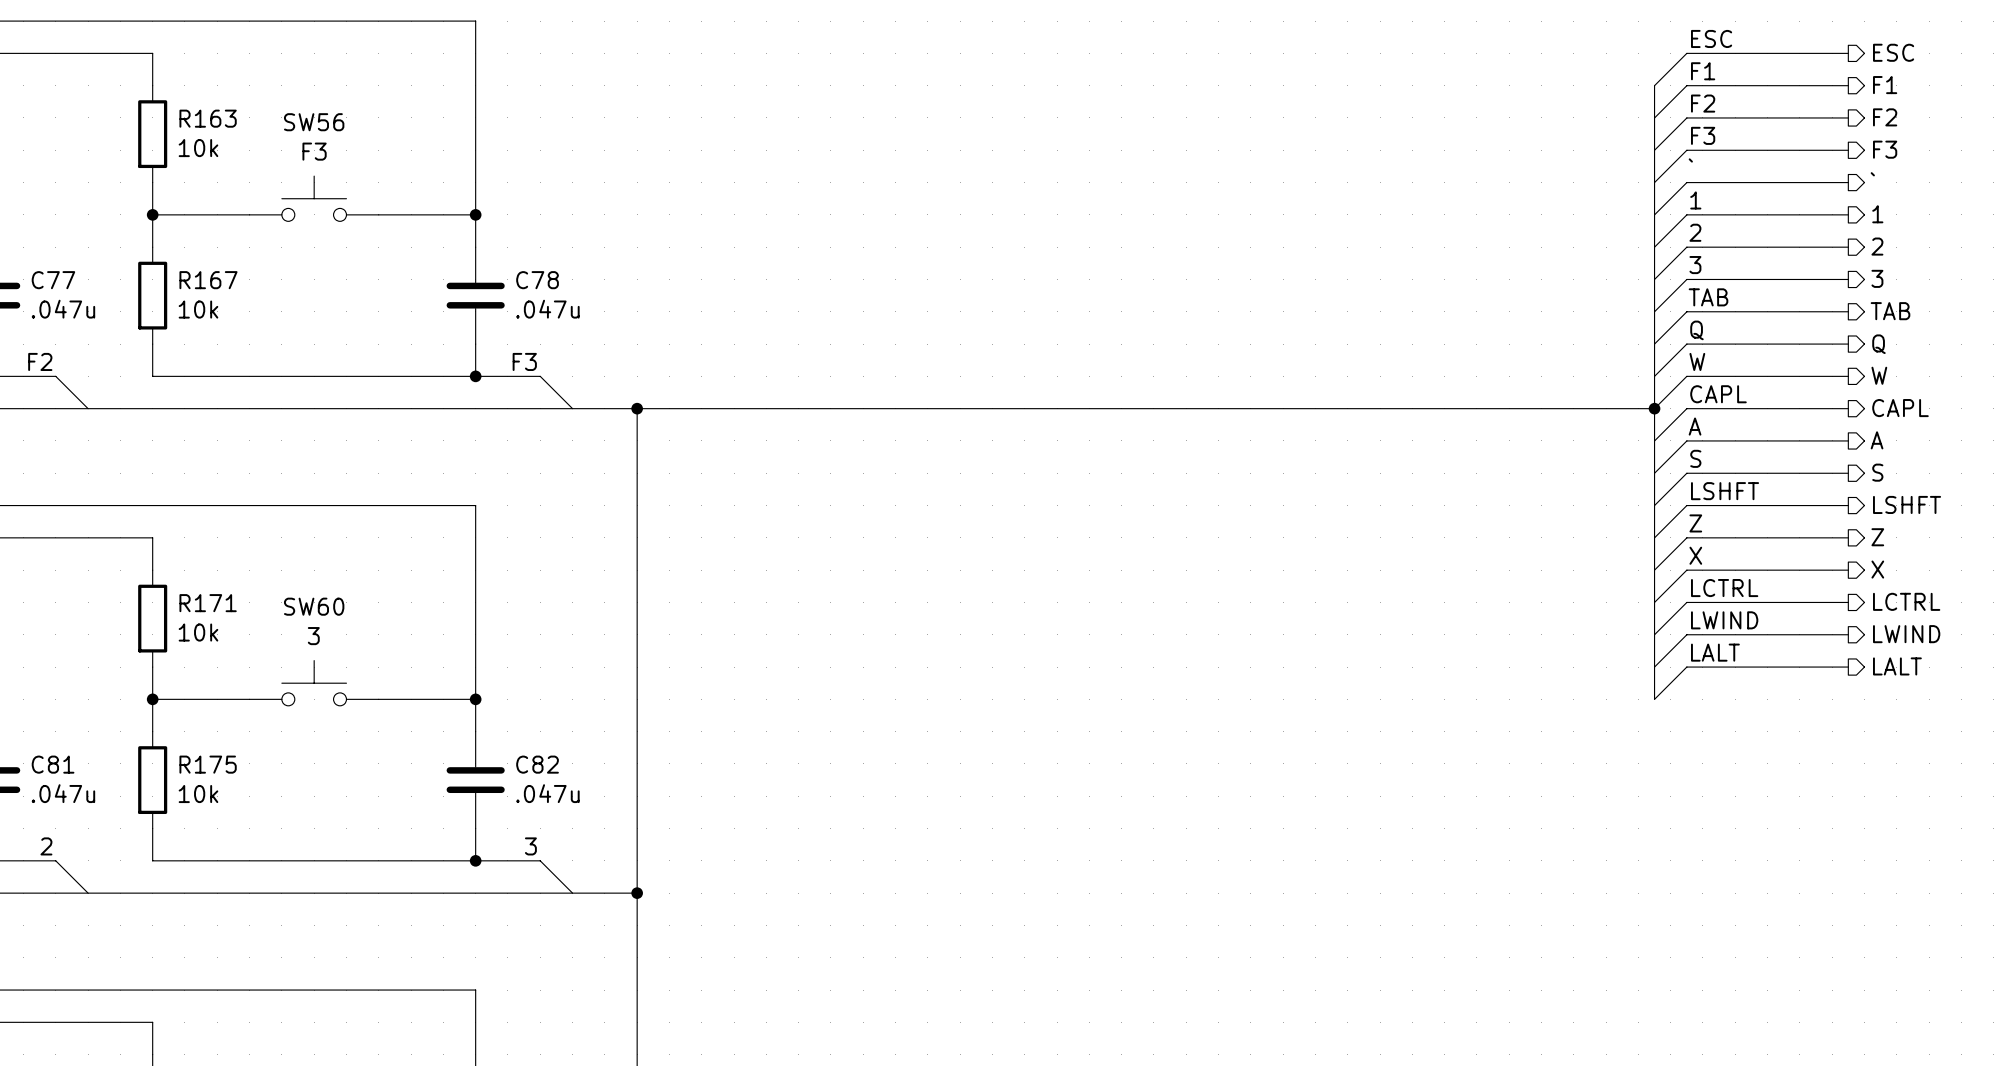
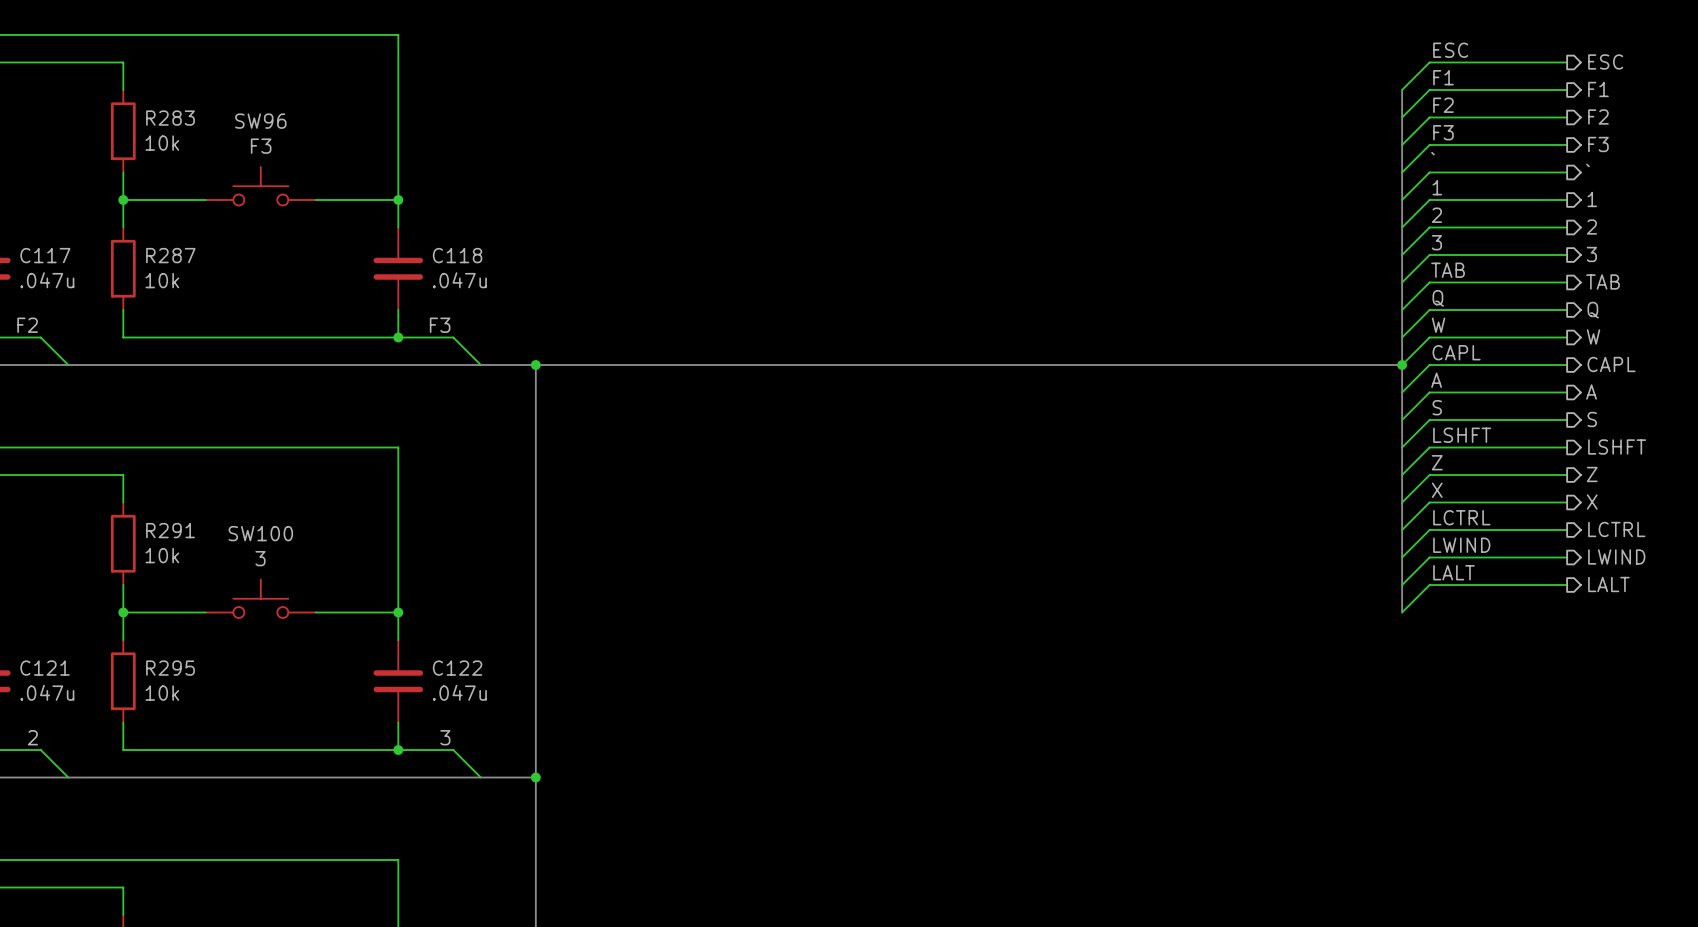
R163 name: R163 (208, 118) -> R283 (170, 118)
SW56 name: SW56 (314, 122) -> SW96 (260, 121)
C77 name: C77 (53, 280) -> C117 (45, 255)
R167 name: R167 (208, 280) -> R287 (170, 255)
C78 name: C78 (537, 280) -> C118 (457, 255)
R171 name: R171 (208, 603) -> R291 (170, 530)
SW60 name: SW60 (314, 606) -> SW100 (260, 533)
C81 name: C81 (53, 764) -> C121 (45, 668)
R175 name: R175 (208, 764) -> R295 (170, 668)
C82 name: C82 (537, 764) -> C122 (457, 668)

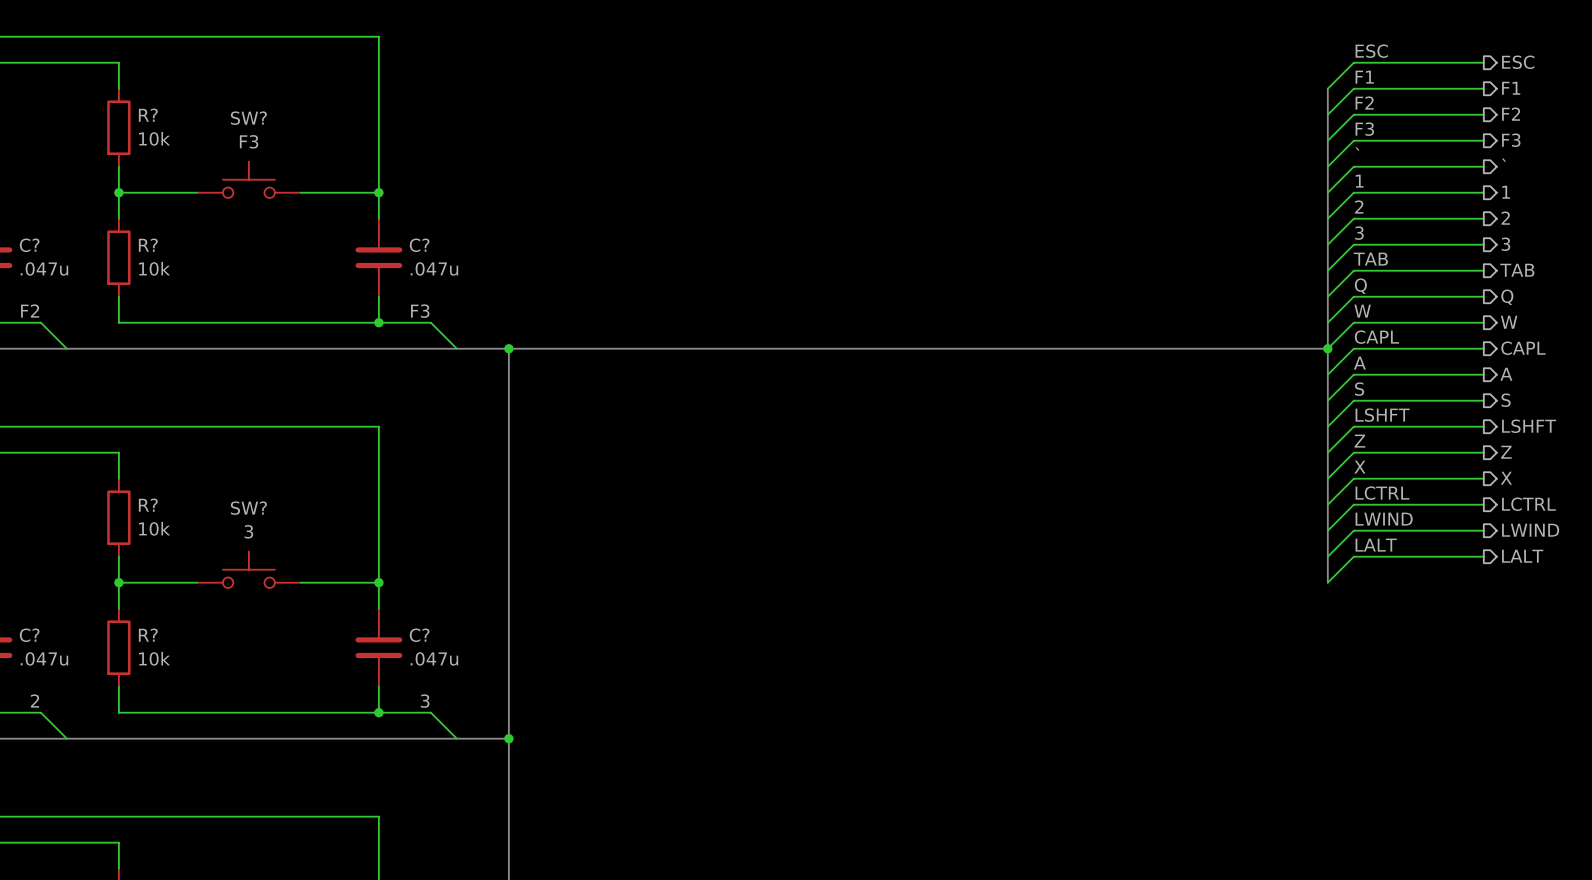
R283 name: R283 (170, 118) -> R? (148, 115)
SW96 name: SW96 (260, 121) -> SW? (248, 118)
C117 name: C117 (45, 255) -> C? (29, 245)
R287 name: R287 (170, 255) -> R? (148, 245)
C118 name: C118 (457, 255) -> C? (419, 245)
R291 name: R291 (170, 530) -> R? (148, 505)
SW100 name: SW100 (260, 533) -> SW? (248, 508)
C121 name: C121 (45, 668) -> C? (29, 635)
R295 name: R295 (170, 668) -> R? (148, 635)
C122 name: C122 (457, 668) -> C? (419, 635)

